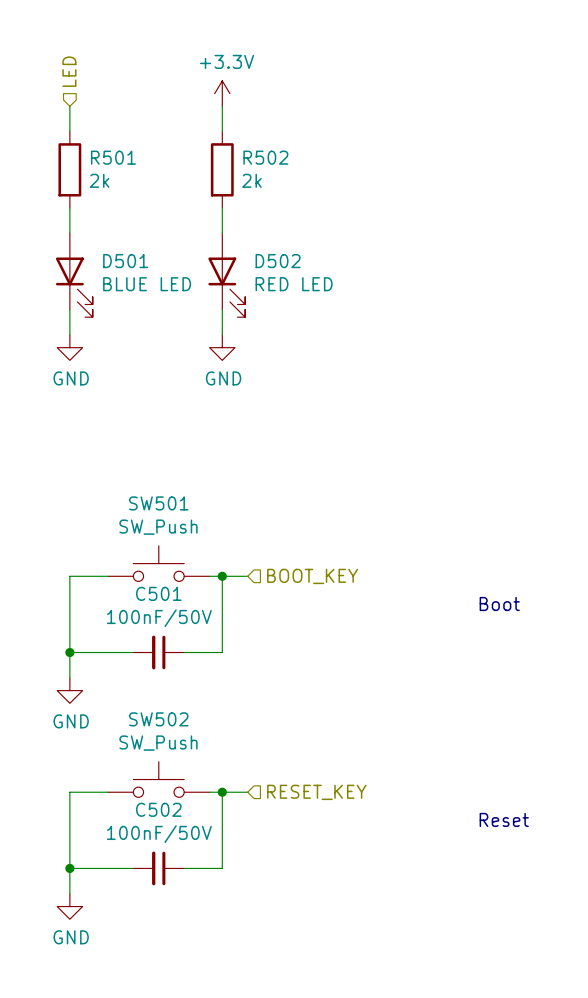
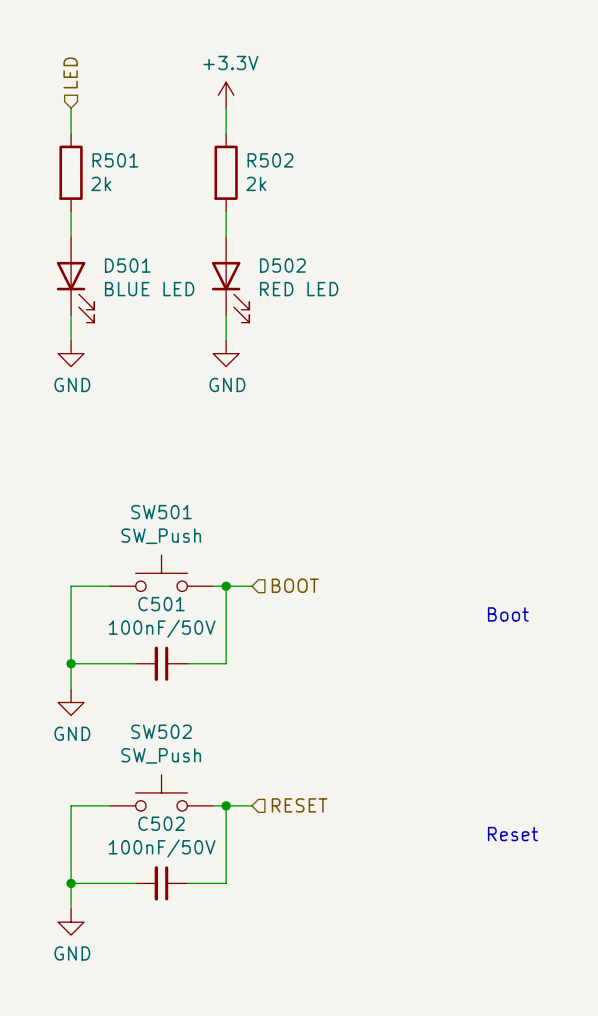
hierarchical label: BOOT_KEY (312, 576) -> BOOT (295, 585)
hierarchical label: RESET_KEY (316, 792) -> RESET (299, 805)

